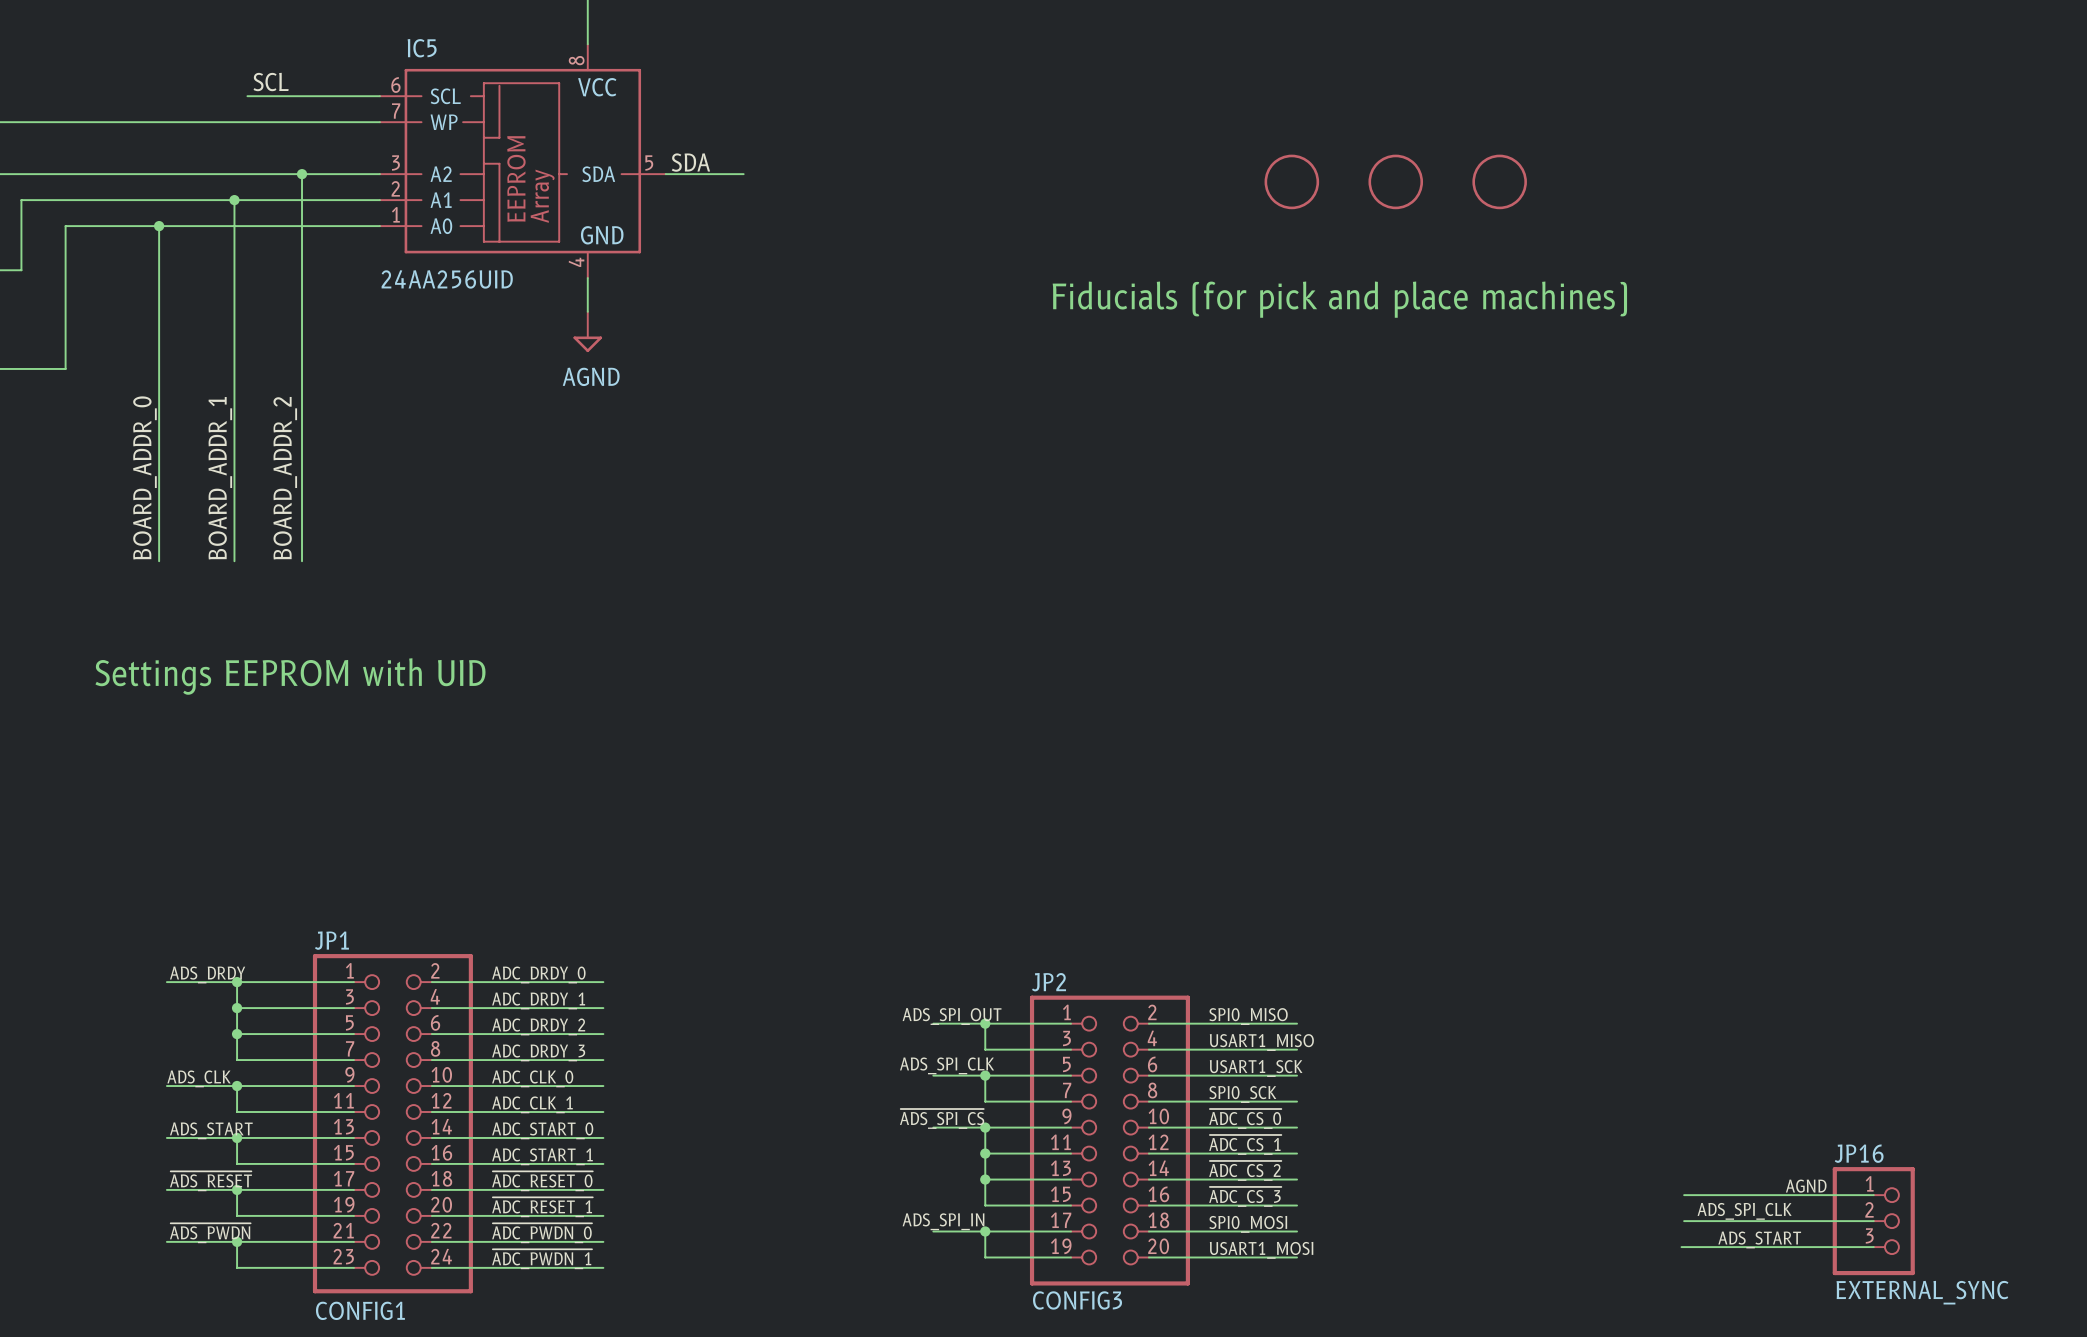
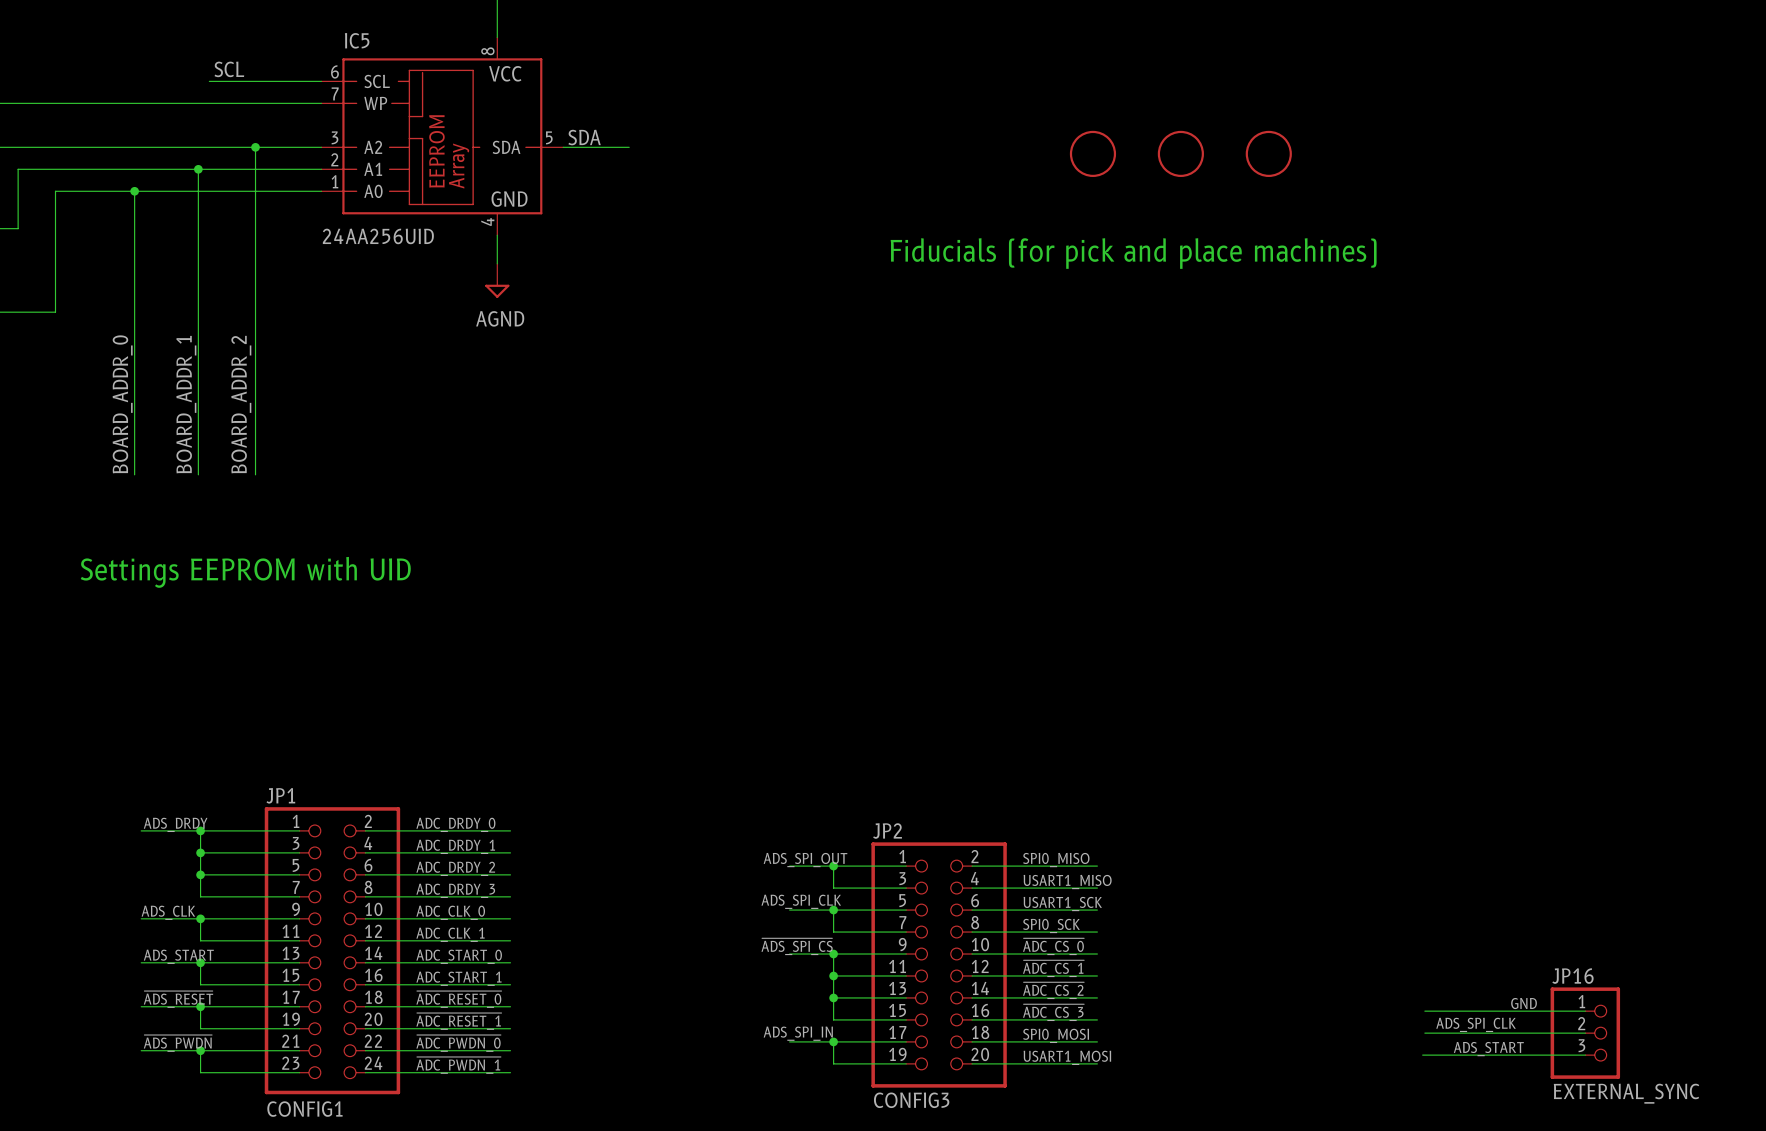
label: AGND (1806, 1186) -> GND (1524, 1003)

